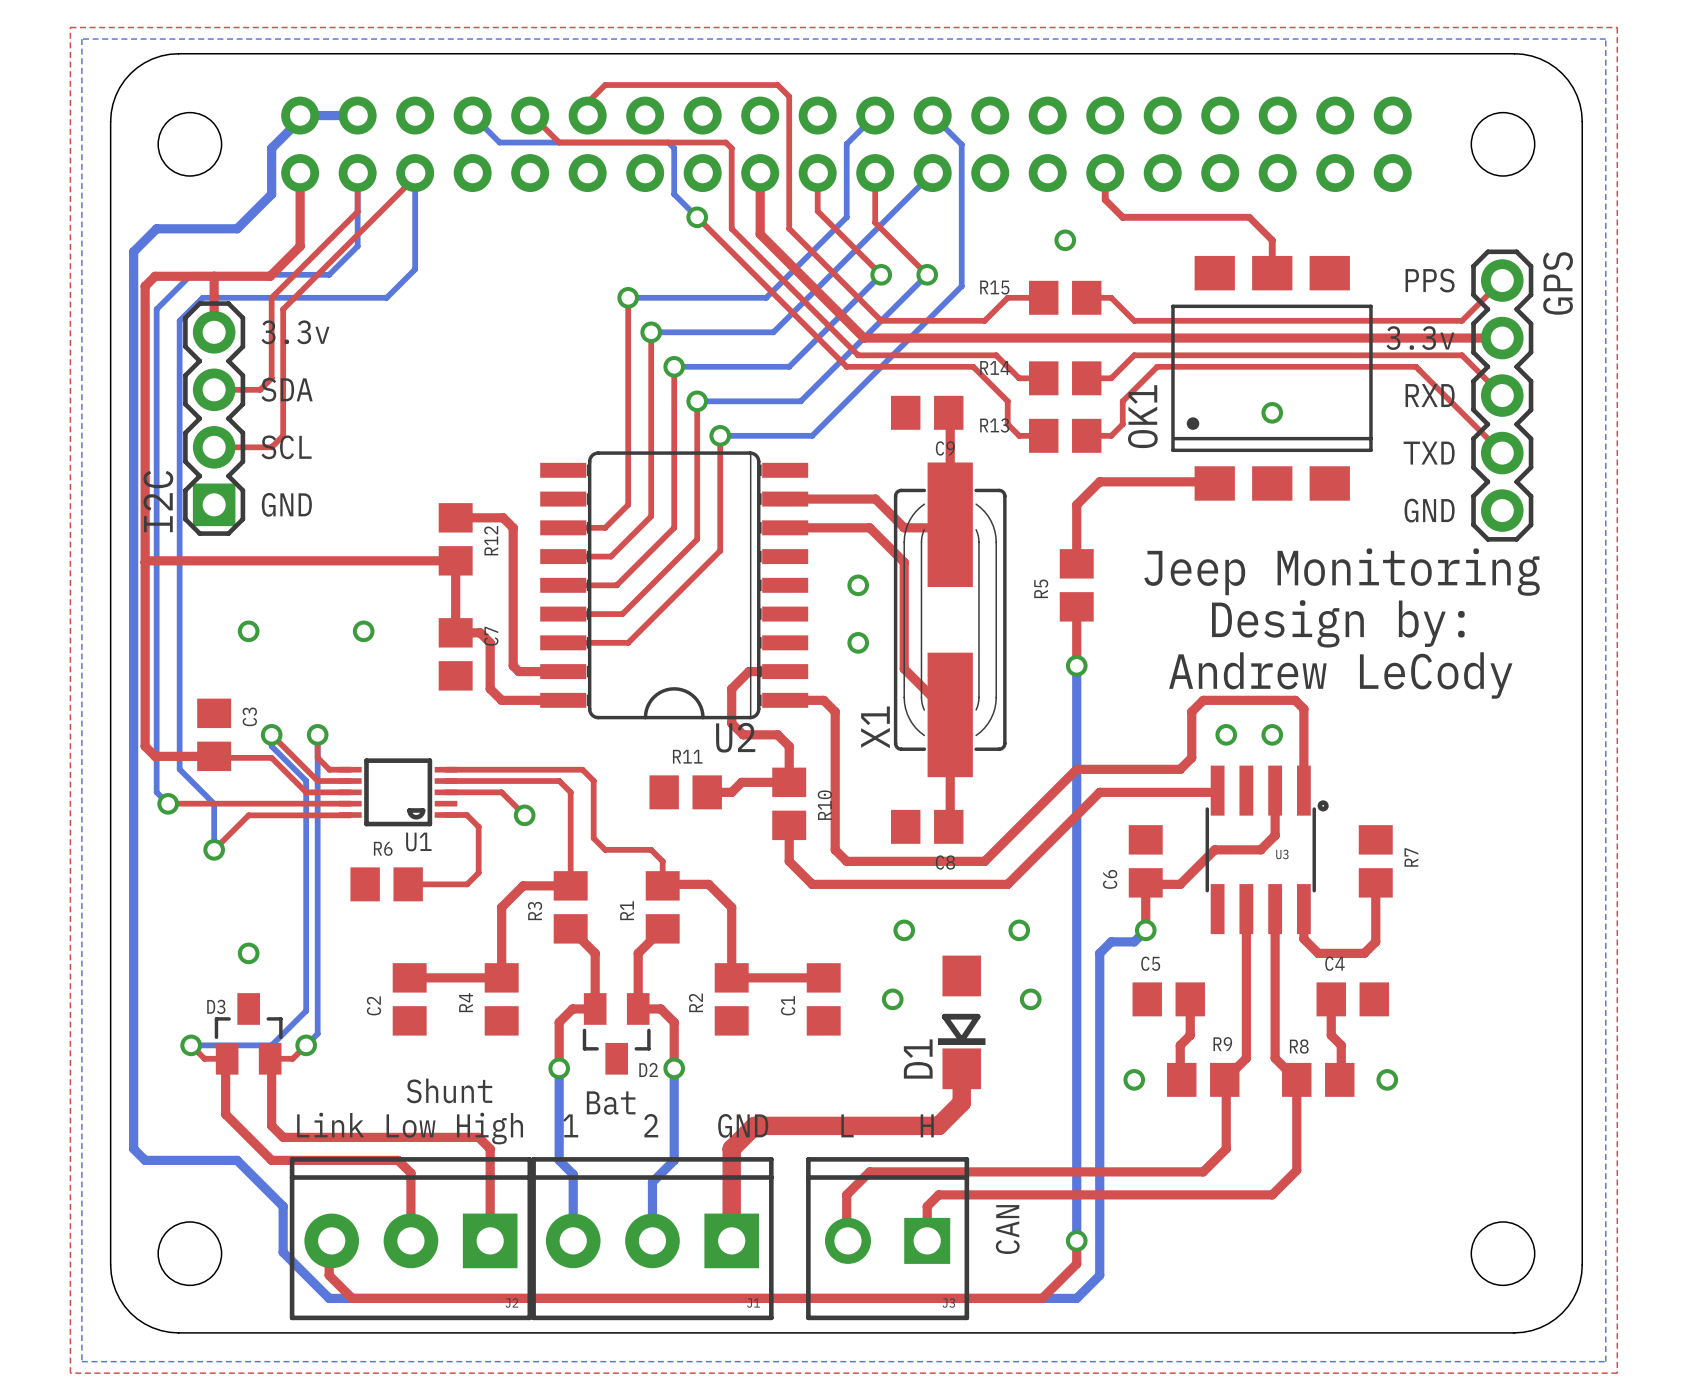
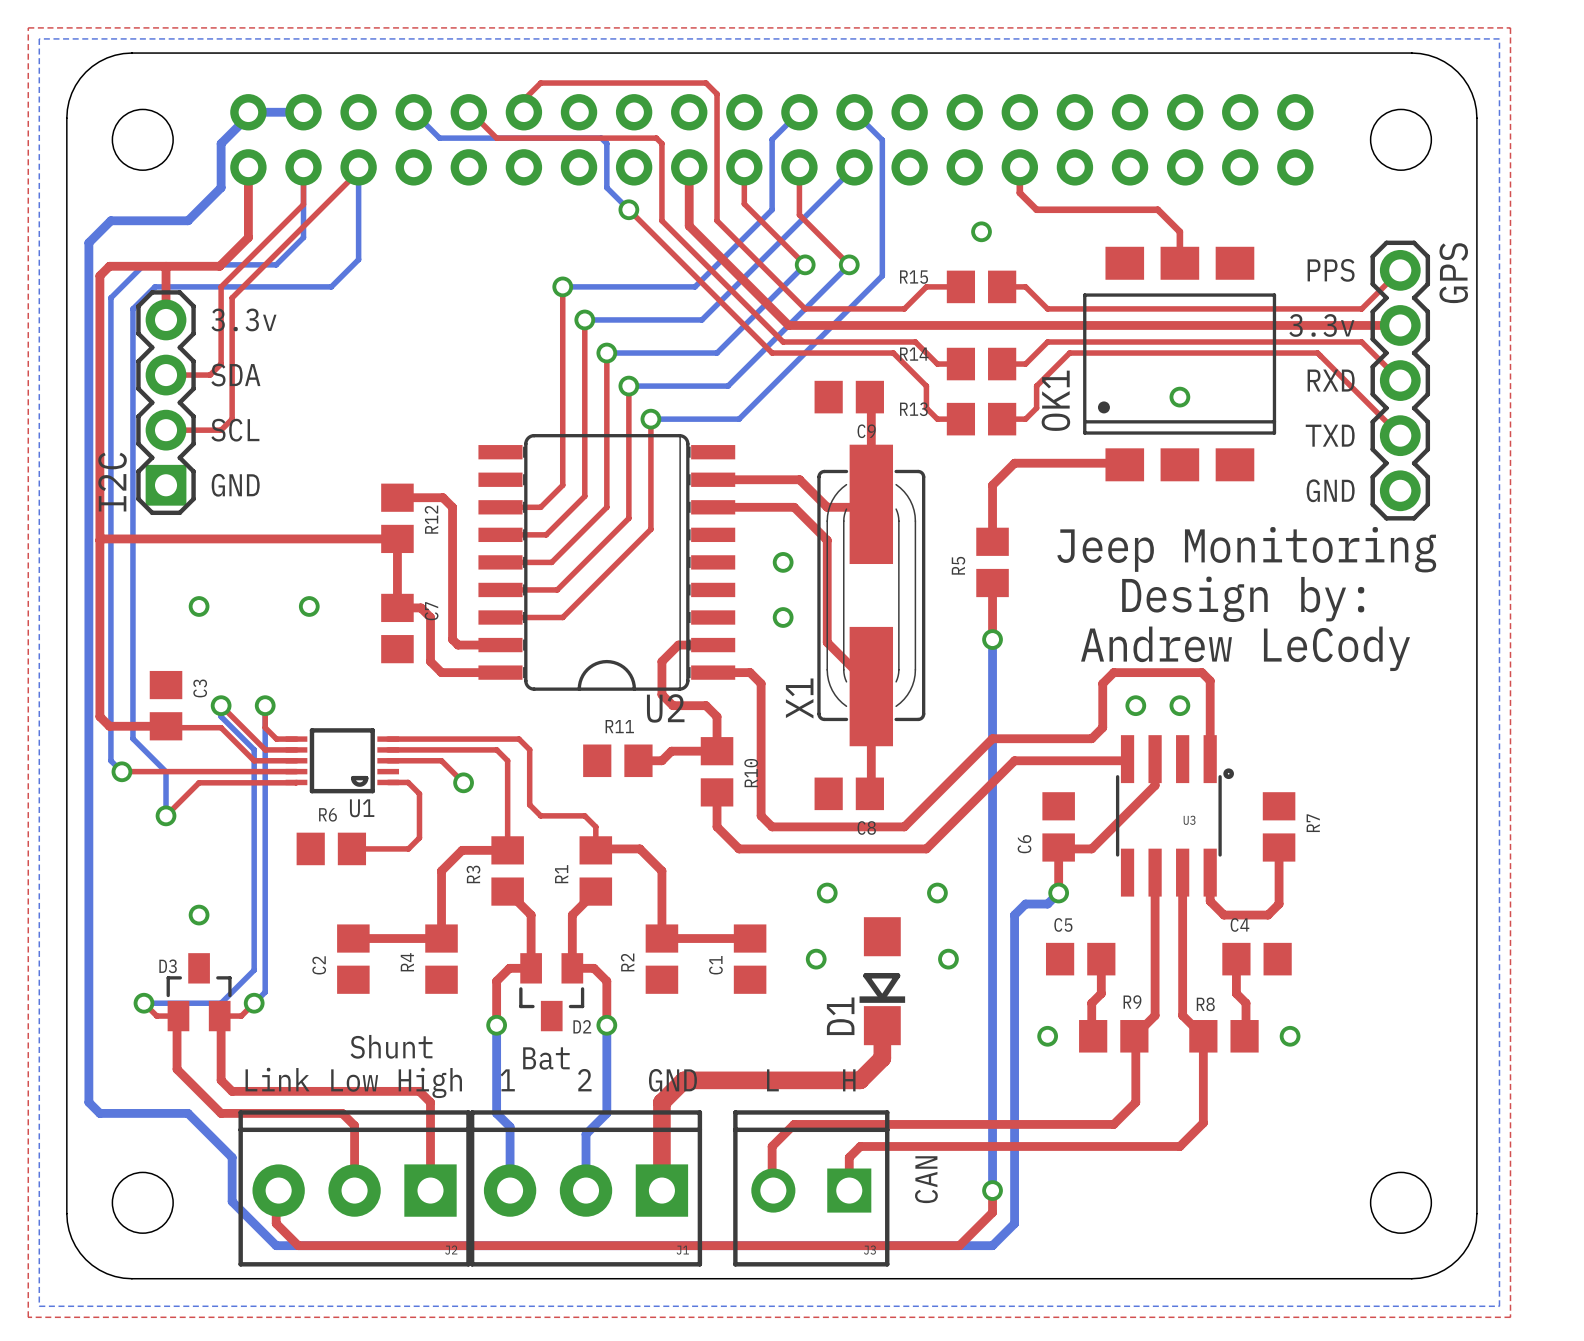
top track: (1275, 790) (1275, 835) (1260, 849) (1214, 849) -> (1155, 759) (1155, 785) (1124, 815)

